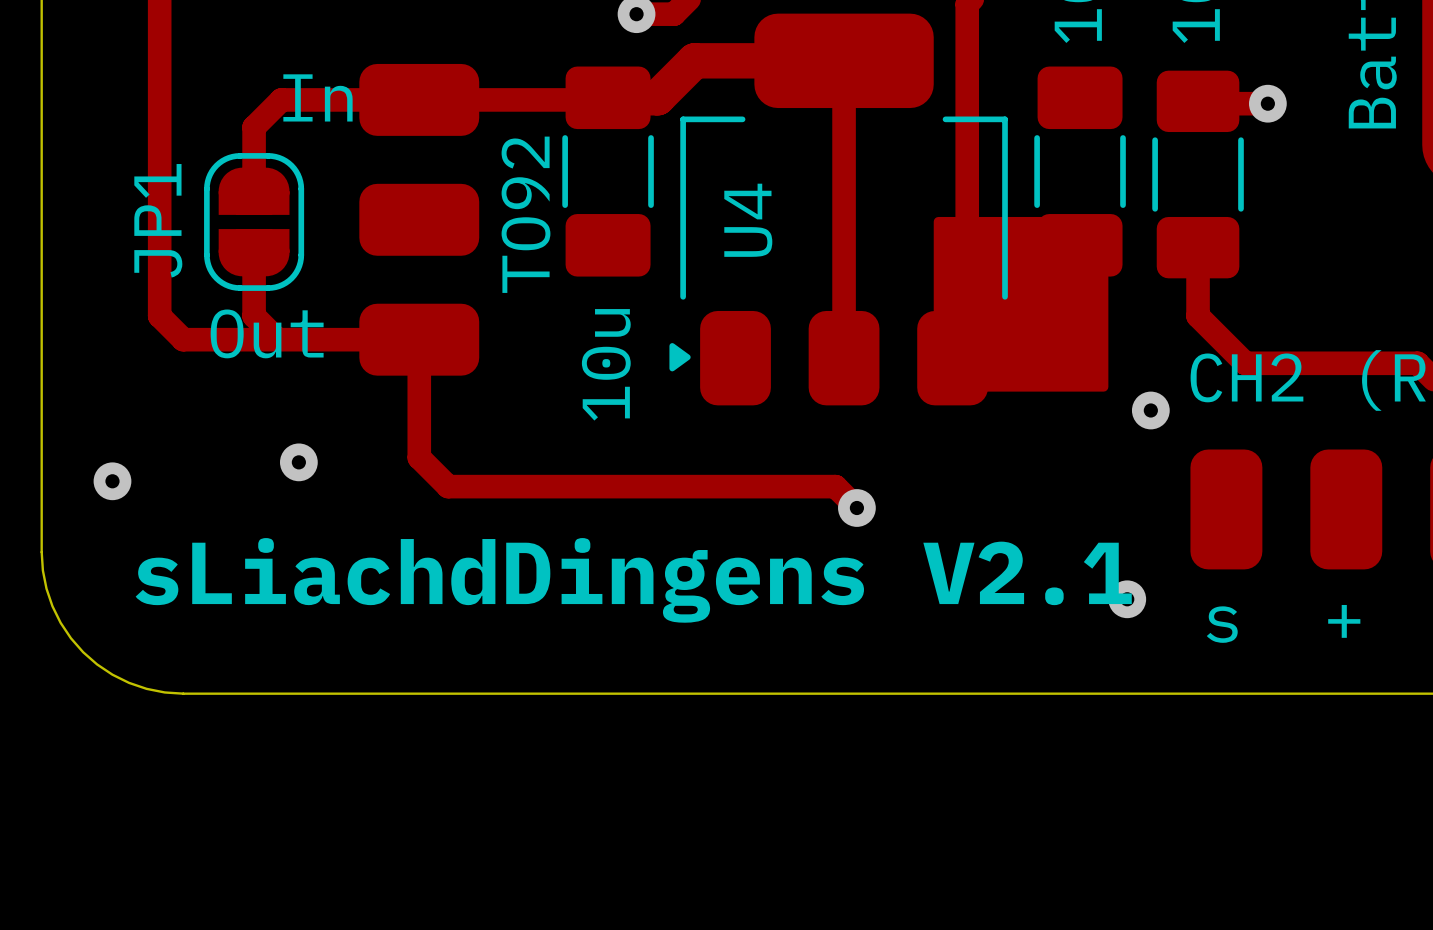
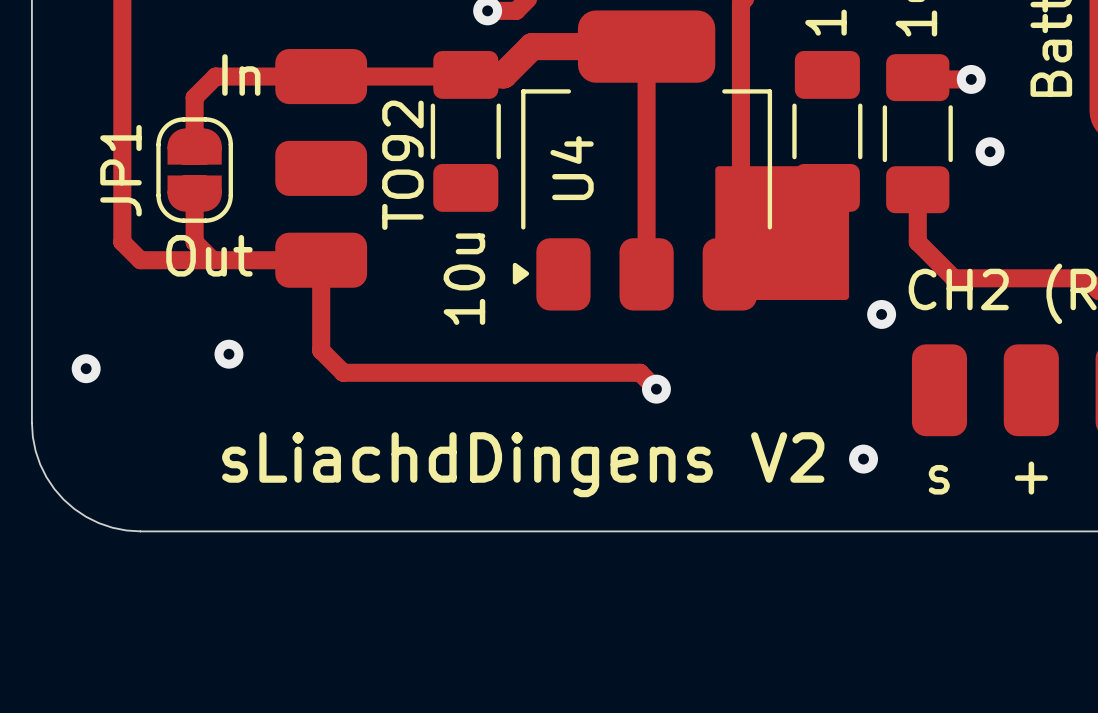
via: none -> (990, 151)
text: sLiachdDingens V2.1 (633, 580) -> sLiachdDingens V2 (523, 464)

